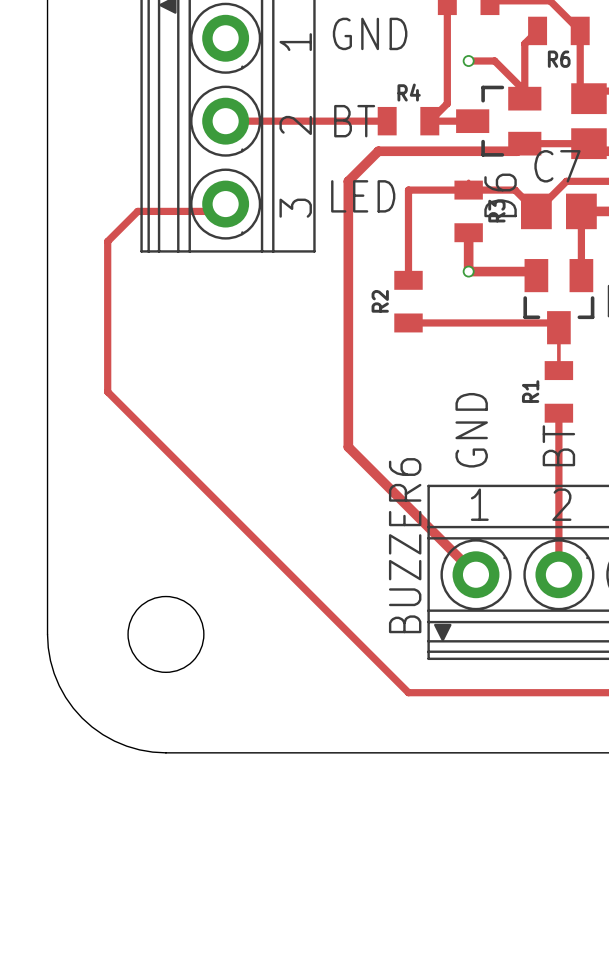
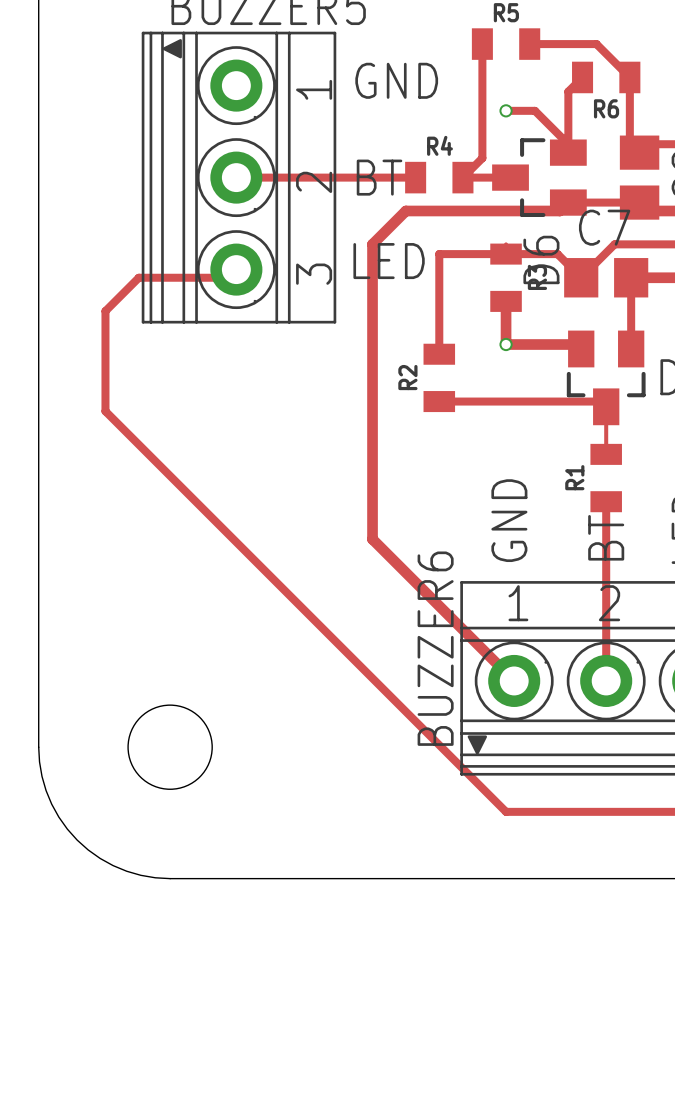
track: (107, 331) (107, 391) (408, 692) (468, 692) -> (105, 411) (506, 811)

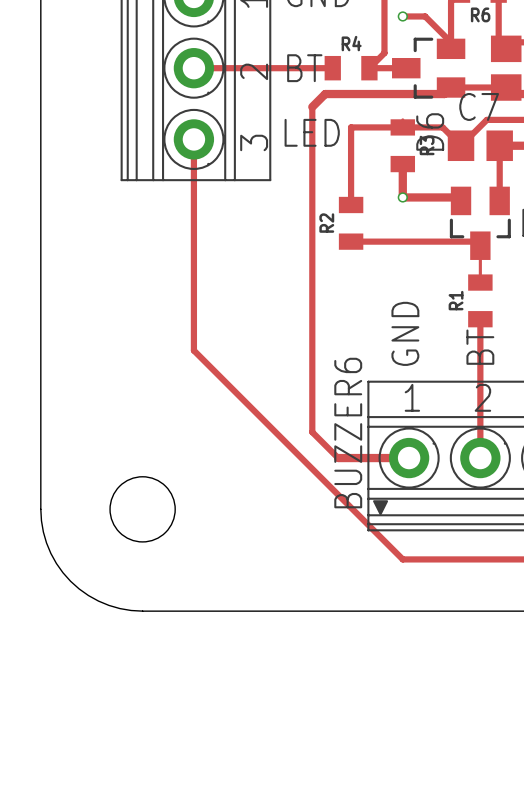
track: (389, 227) (372, 244) (372, 539) (514, 680) -> (312, 106) (312, 432) (338, 458) (409, 458)
track: (236, 269) (228, 277) (138, 277) (105, 311) (105, 411) (236, 542) -> (193, 139) (193, 350)

